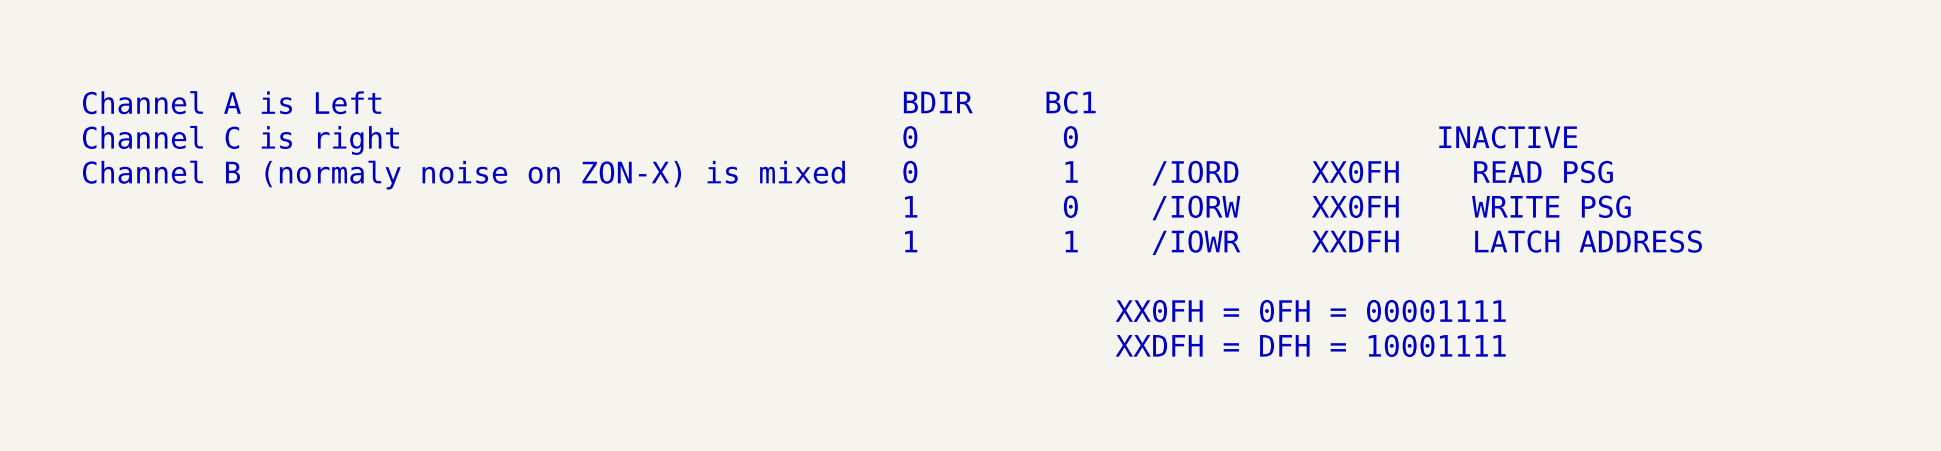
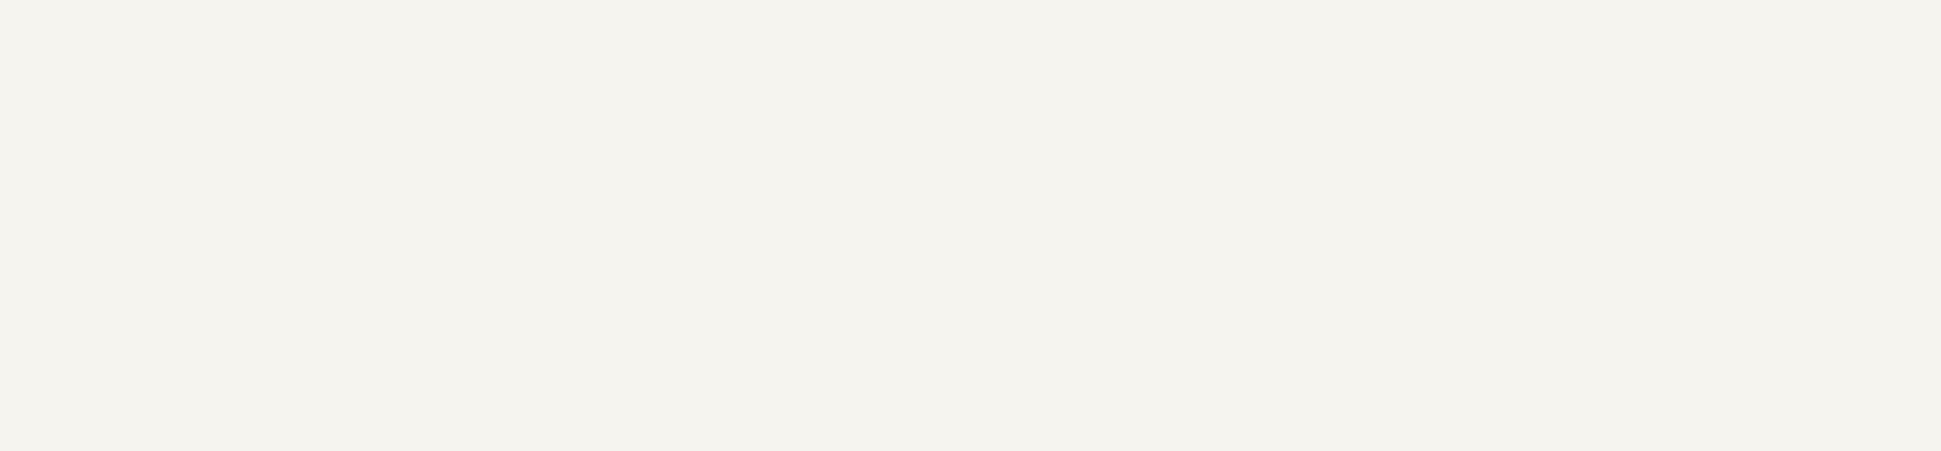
text: Channel A is Left (232, 102) -> none
text: BDIR BC1 (999, 102) -> none
text: 0 0 INACTIVE (1240, 137) -> none
text: Channel C is right (240, 140) -> none
text: 0 1 /IORD XX0FH READ PSG (1258, 173) -> none
text: Channel B (normaly noise on ZON-X) is mixed (463, 175) -> none
text: 1 0 /IORW XX0FH WRITE PSG (1267, 207) -> none
text: 1 1 /IOWR XXDFH LATCH ADDRESS (1303, 242) -> none
text: XX0FH = 0FH = 00001111 (1310, 311) -> none
text: XXDFH = DFH = 10001111 (1310, 345) -> none

